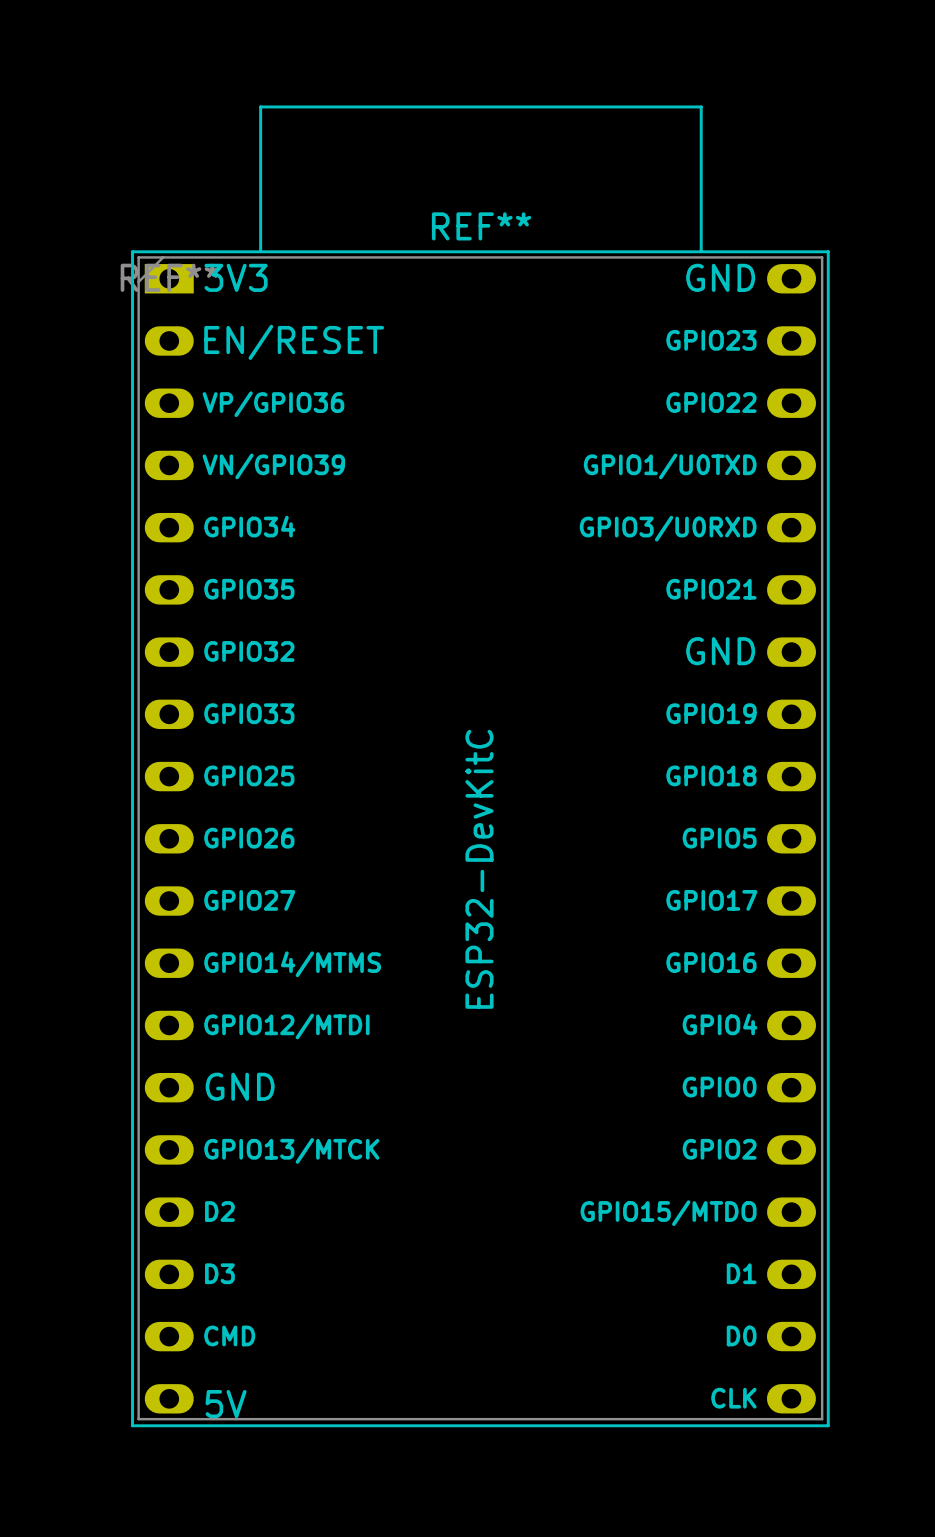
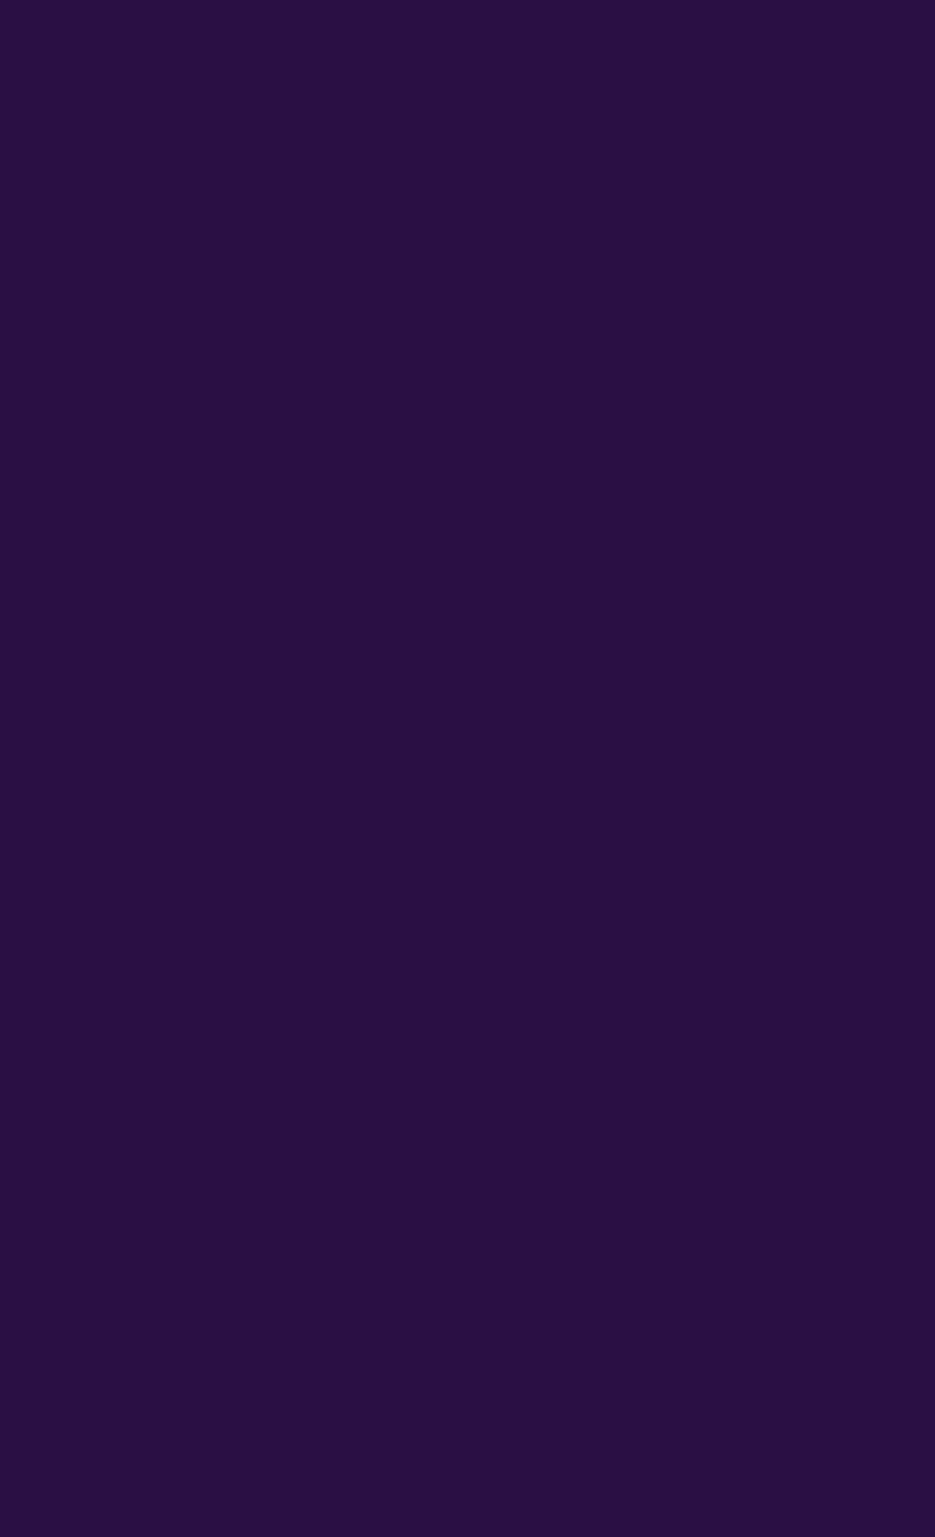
REF**: ESP32-DevKitC (480, 766) -> none

